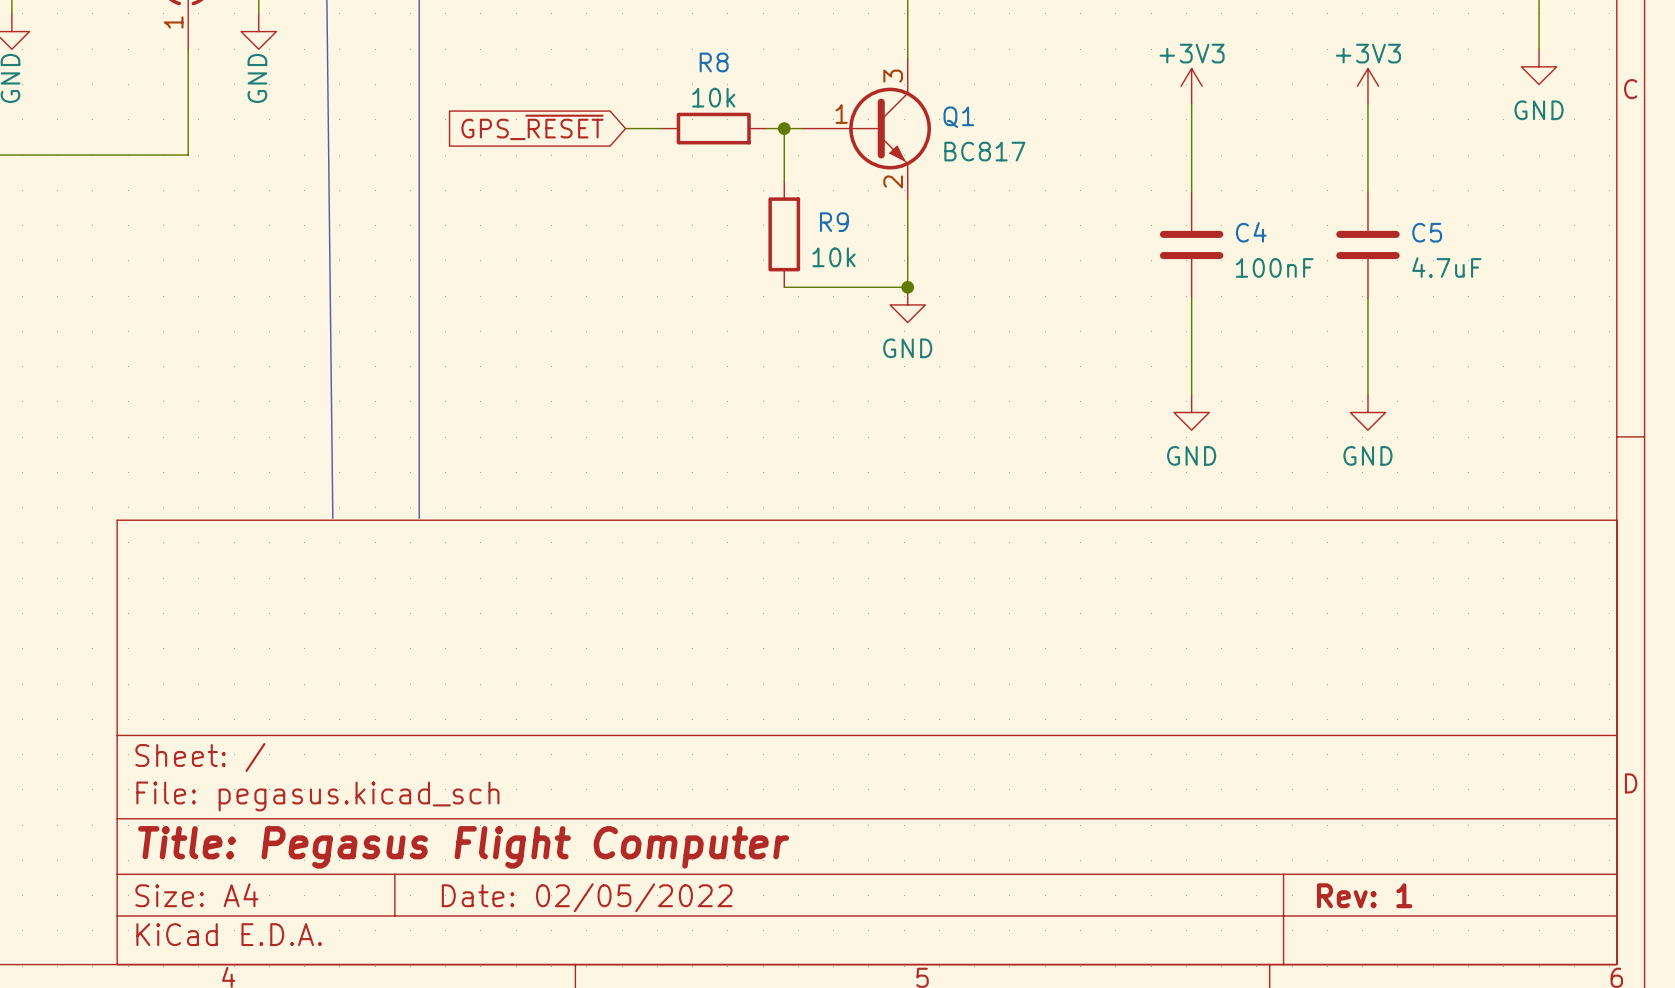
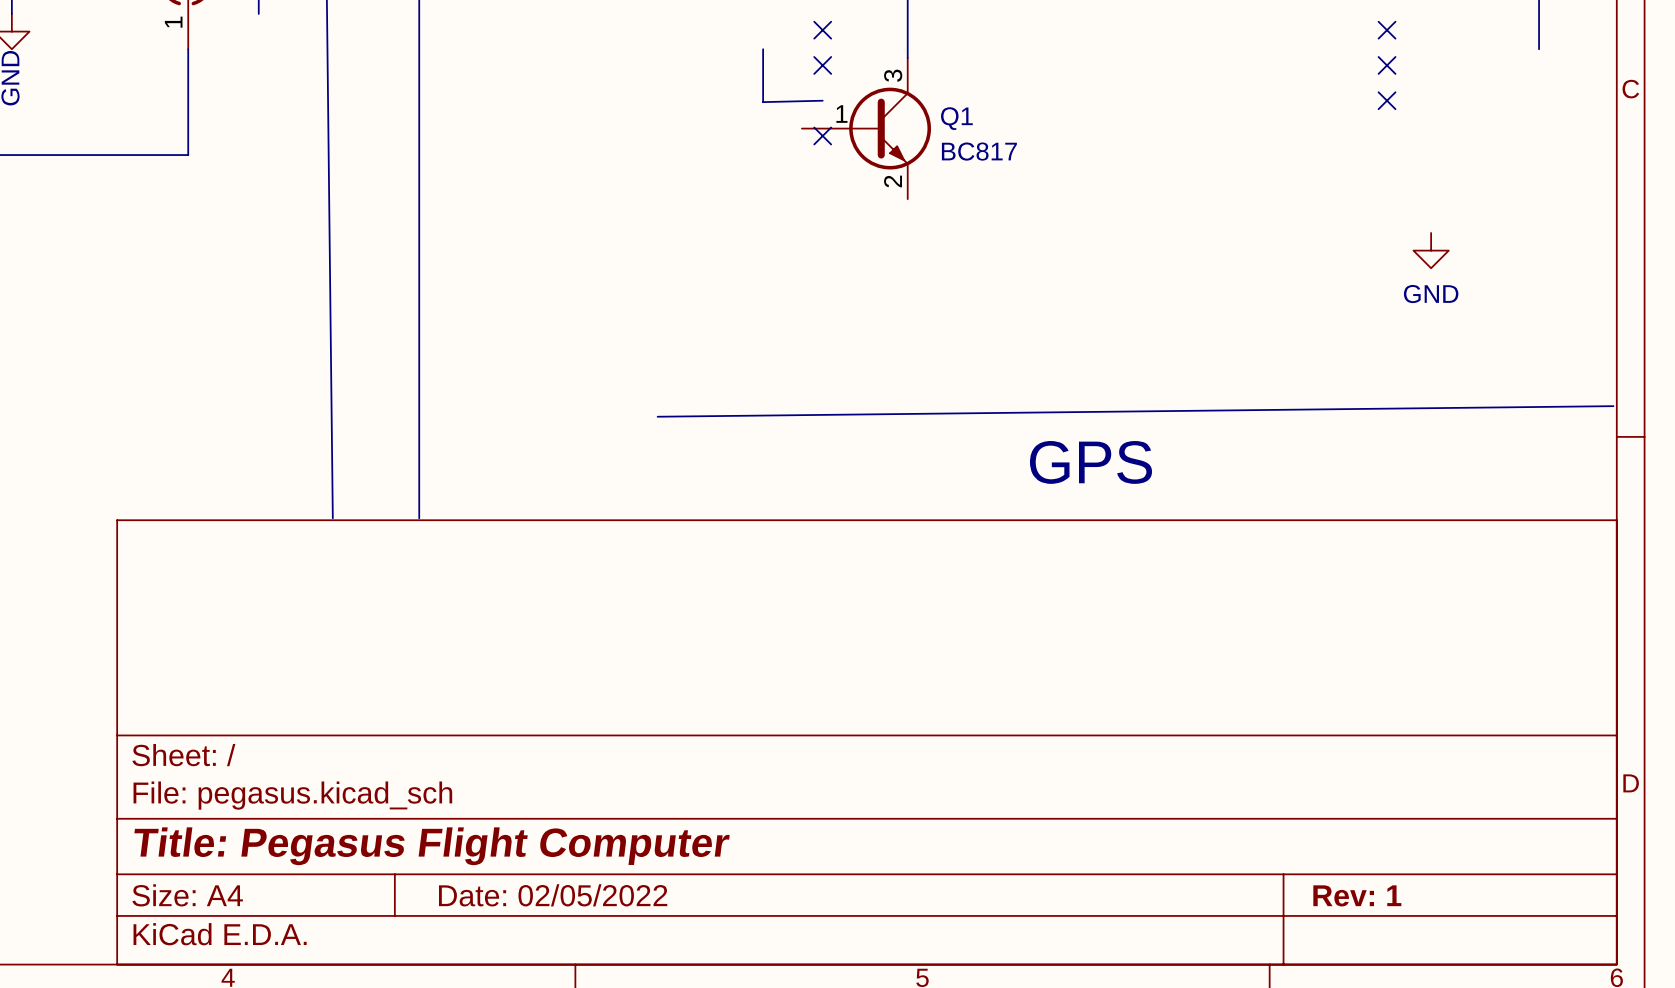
no-connect mark: none -> (822, 30)
no-connect mark: none -> (1387, 30)
power symbol: GND (258, 31) -> none
wire: none -> (763, 49) (763, 102) (822, 100)
no-connect mark: none -> (822, 65)
no-connect mark: none -> (1387, 65)
power symbol: GND (1539, 66) -> none
power symbol: +3V3 (1191, 86) -> none
power symbol: +3V3 (1367, 86) -> none
no-connect mark: none -> (1387, 100)
wire: (1191, 103) (1191, 192) -> none
wire: (1367, 103) (1367, 192) -> none
global label: GPS_~{RESET} (532, 127) -> none
wire: (625, 128) (660, 128) -> none
R8: 10k (713, 128) -> none
wire: (766, 128) (801, 128) -> none
wire: (784, 128) (784, 181) -> none
junction: (784, 128) -> none
no-connect mark: none -> (822, 135)
wire: (907, 199) (907, 287) (784, 287) -> none
R9: 10k (784, 234) -> none
C4: 100nF (1191, 244) -> none
C5: 4.7uF (1367, 244) -> none
power symbol: none -> GND (1431, 250)
junction: (907, 287) -> none
wire: (1191, 297) (1191, 394) -> none
wire: (1367, 297) (1367, 394) -> none
power symbol: GND (907, 304) -> none
line: none -> (1613, 406) (657, 416)
power symbol: GND (1191, 412) -> none
power symbol: GND (1367, 412) -> none
text: none -> GPS (1090, 462)

